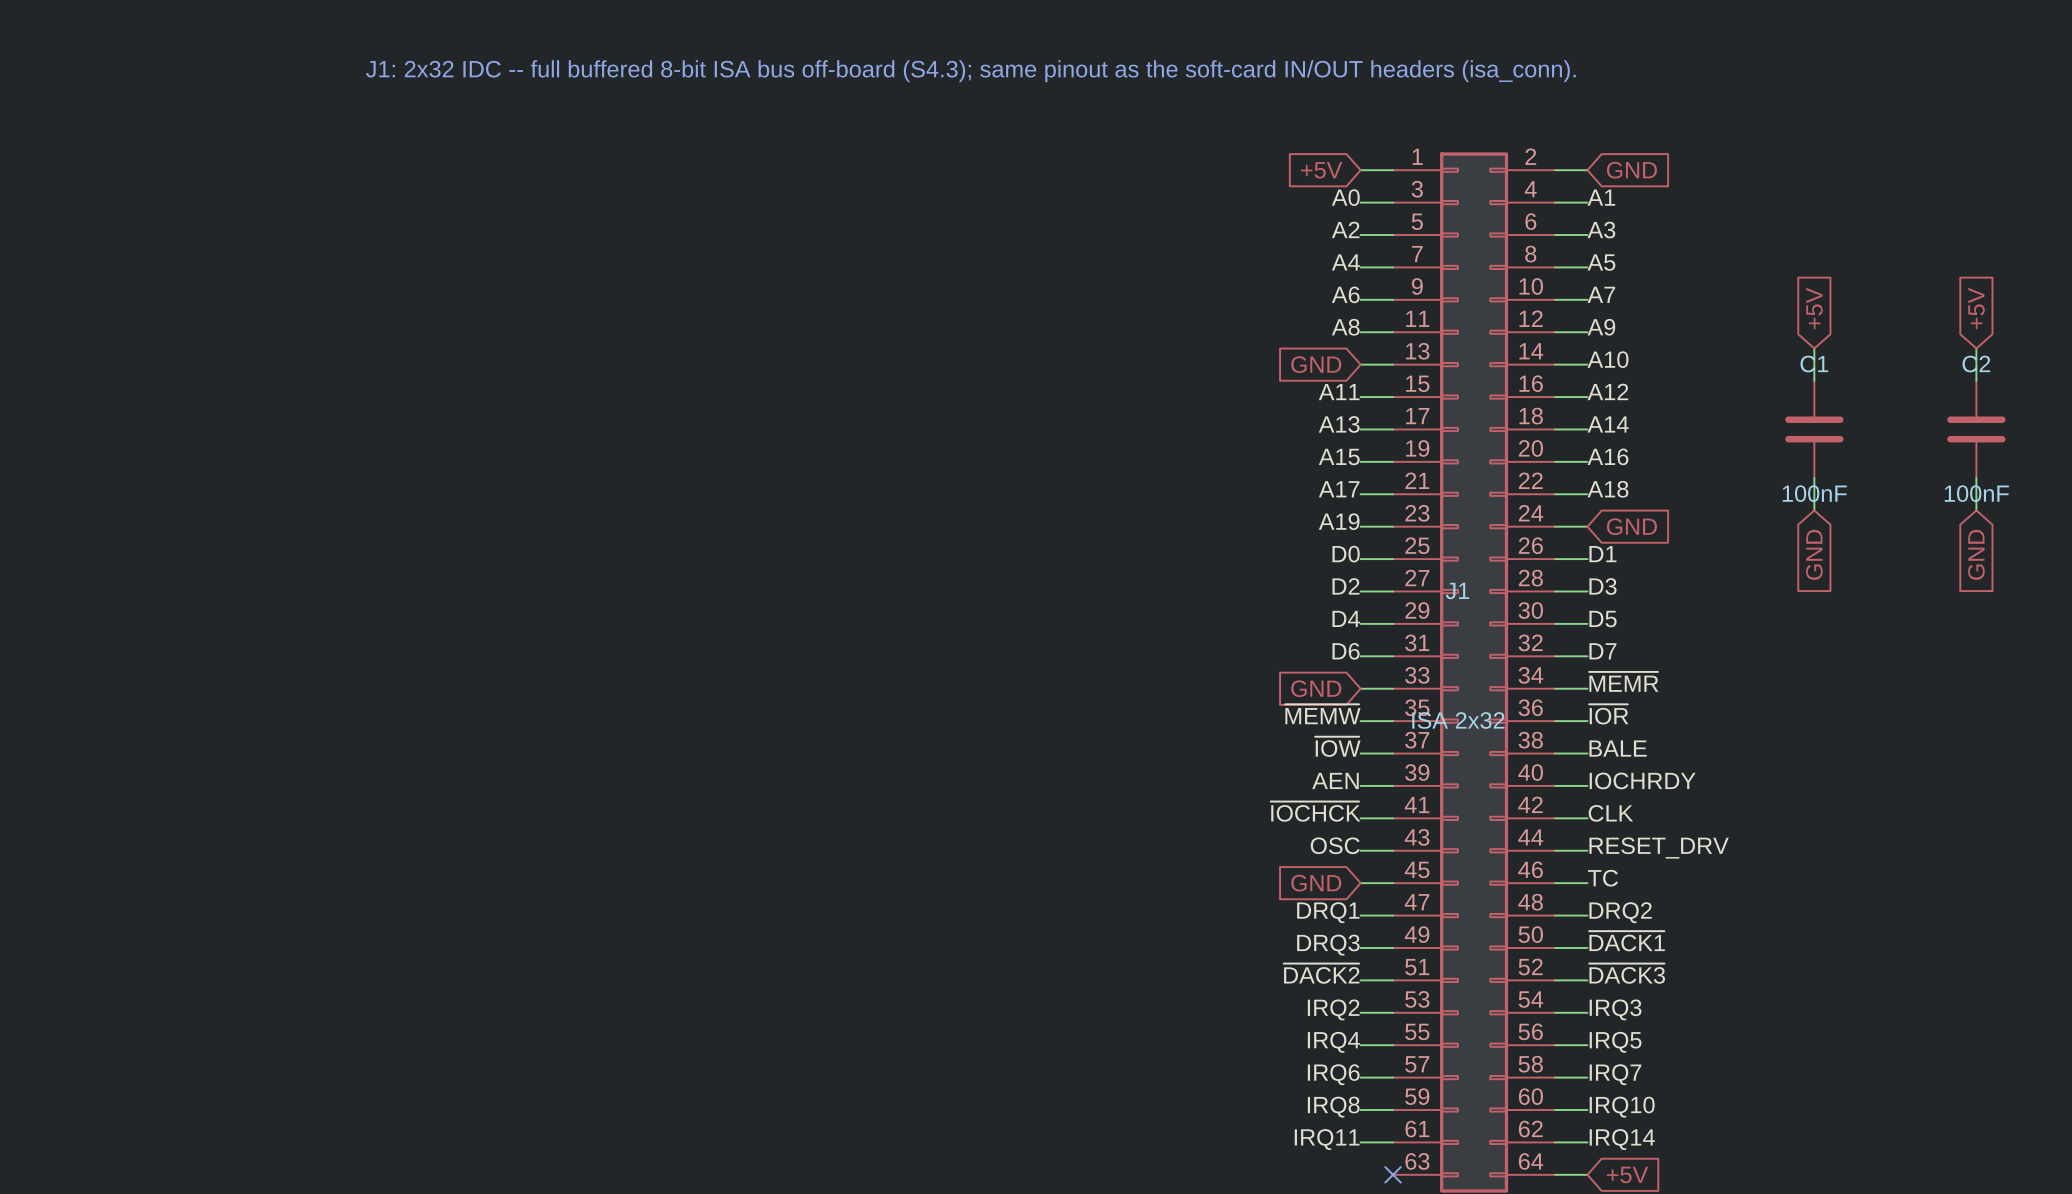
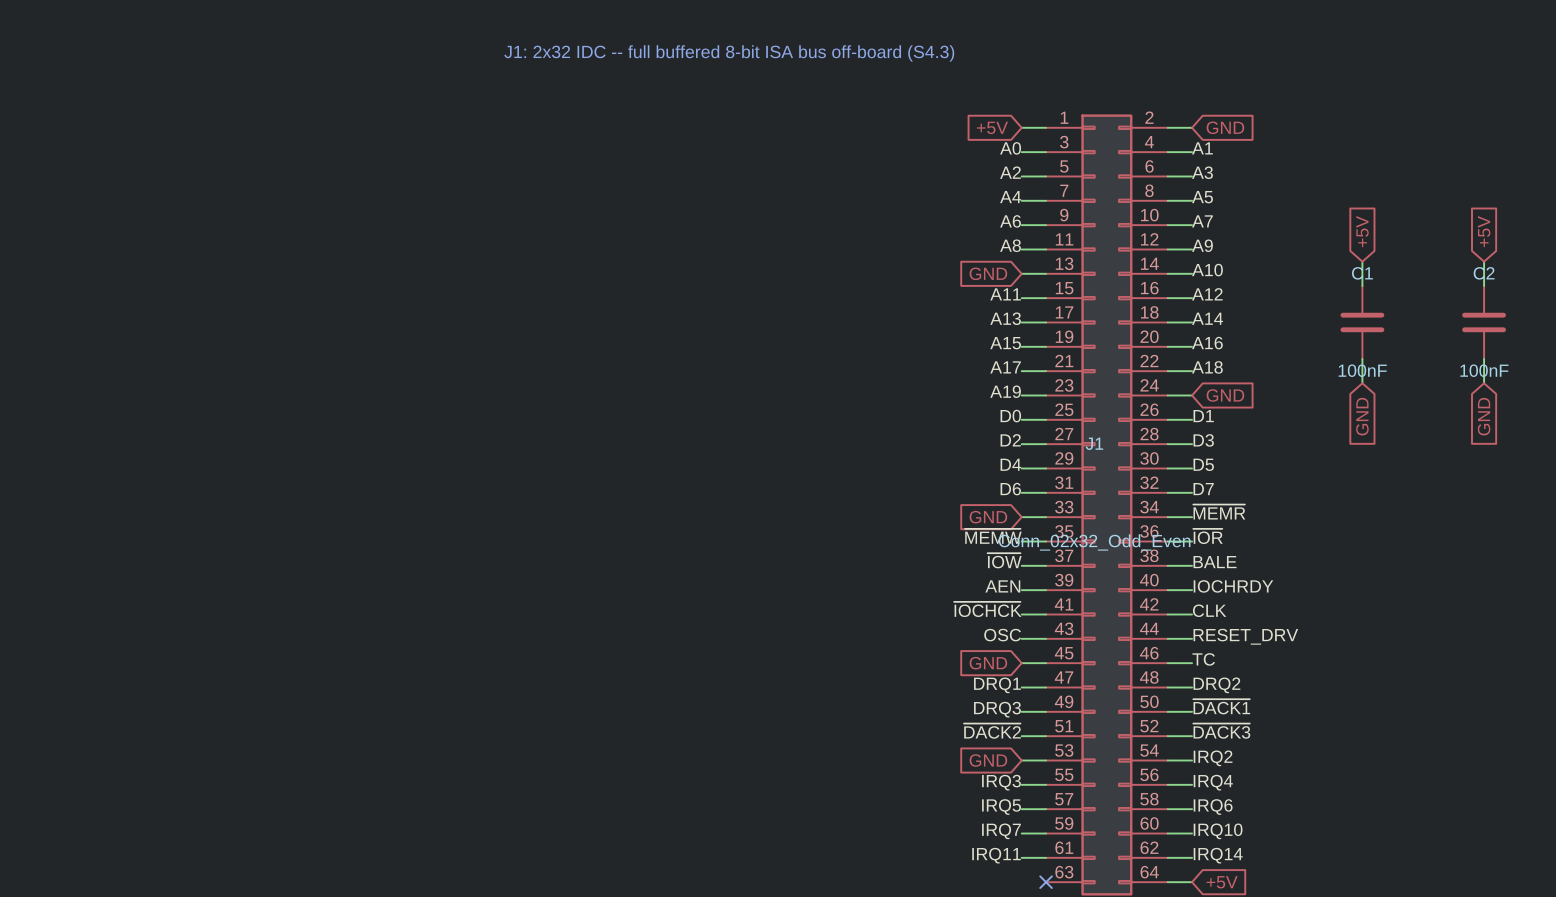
text: J1: 2x32 IDC -- full buffered 8-bit ISA bus off-board (S4.3); same pinout as the soft-card IN/OUT headers (isa_conn). (970, 71) -> J1: 2x32 IDC -- full buffered 8-bit ISA bus off-board (S4.3) (729, 53)
J1 value: ISA 2x32 (1458, 720) -> Conn_02x32_Odd_Even (1094, 542)
label: IRQ2 (1333, 1009) -> none
label: IRQ3 (1615, 1009) -> IRQ2 (1213, 758)
global label: none -> GND (988, 760)
label: IRQ4 (1333, 1042) -> IRQ3 (1001, 782)
label: IRQ5 (1615, 1042) -> IRQ4 (1213, 782)
label: IRQ6 (1333, 1074) -> IRQ5 (1001, 807)
label: IRQ7 (1615, 1074) -> IRQ6 (1213, 807)
label: IRQ8 (1333, 1107) -> IRQ7 (1001, 831)

